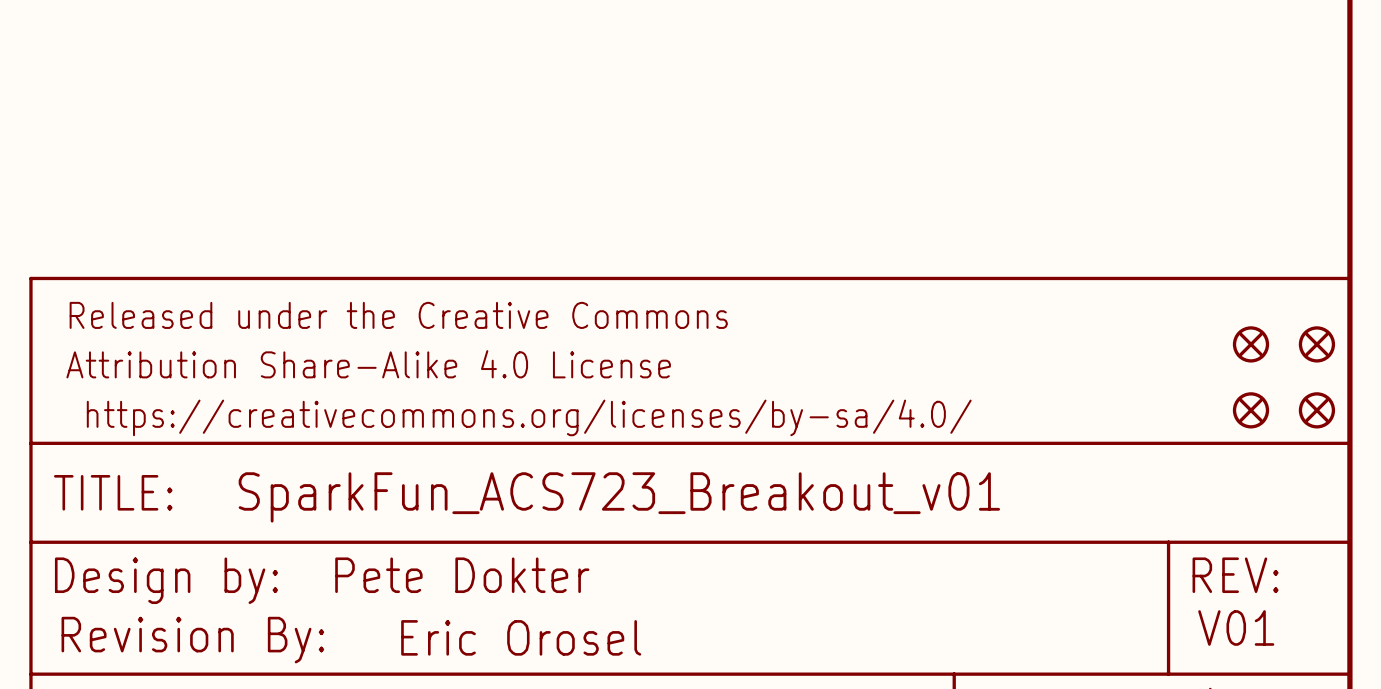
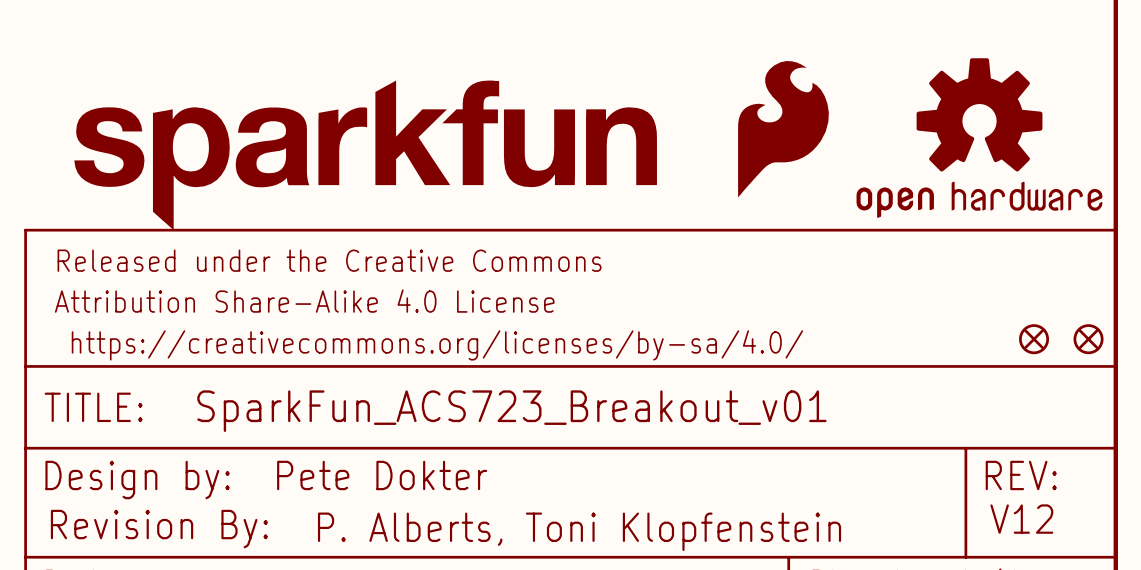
part: none -> (783, 129)
part: none -> (979, 138)
part: none -> (365, 155)
part: (1251, 344) -> none
part: (1316, 344) -> none
text: V01 (1236, 627) -> V12 (1021, 519)
text: Eric Orosel (521, 637) -> none
text: none -> P. Alberts, Toni Klopfenstein (579, 531)

